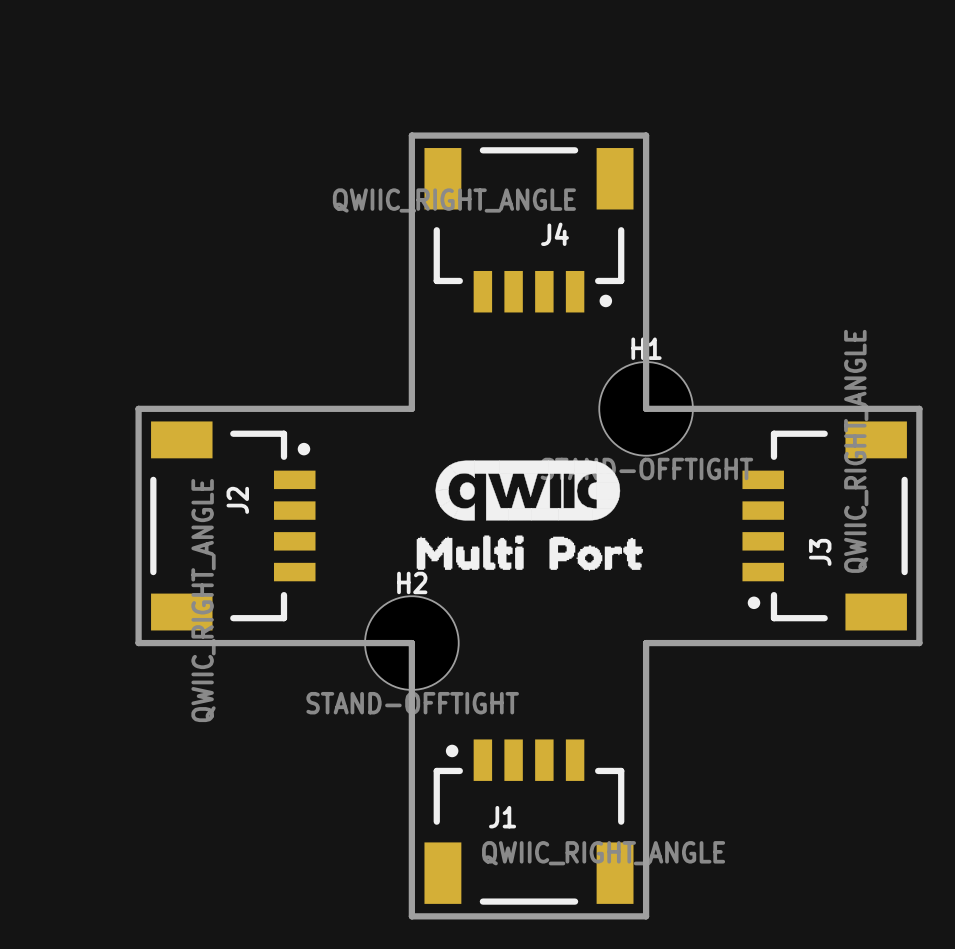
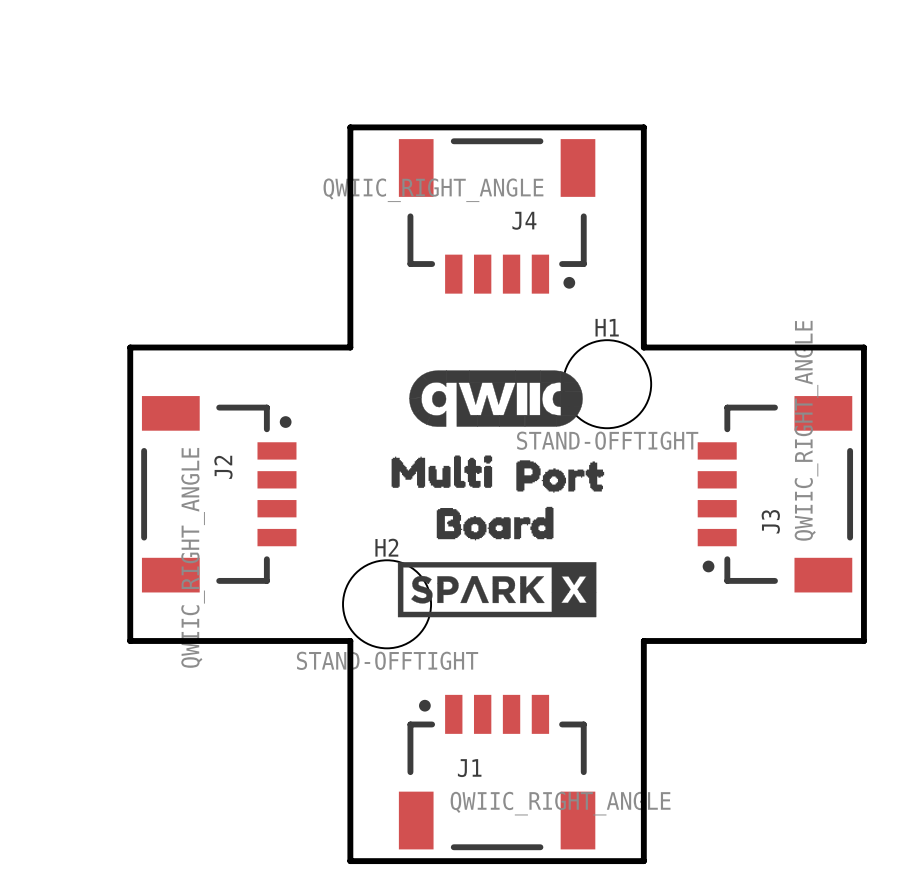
board edge: (411, 135) (411, 408) (138, 408) -> (387, 127) (350, 127) (350, 347) (130, 347) (130, 384)
board edge: (646, 135) (646, 408) (919, 408) -> (607, 127) (643, 127) (643, 347) (863, 347) (863, 384)
drawing position: (527, 490) -> (496, 398)
drawing: none -> [397, 506, 597, 618]
drawing position: (470, 552) -> (441, 471)
drawing position: (596, 553) -> (560, 476)
board edge: (138, 643) (411, 643) (411, 916) -> (130, 604) (130, 641) (350, 641) (350, 861) (387, 861)
board edge: (919, 643) (646, 643) (646, 916) -> (863, 604) (863, 641) (643, 641) (643, 861) (607, 861)

